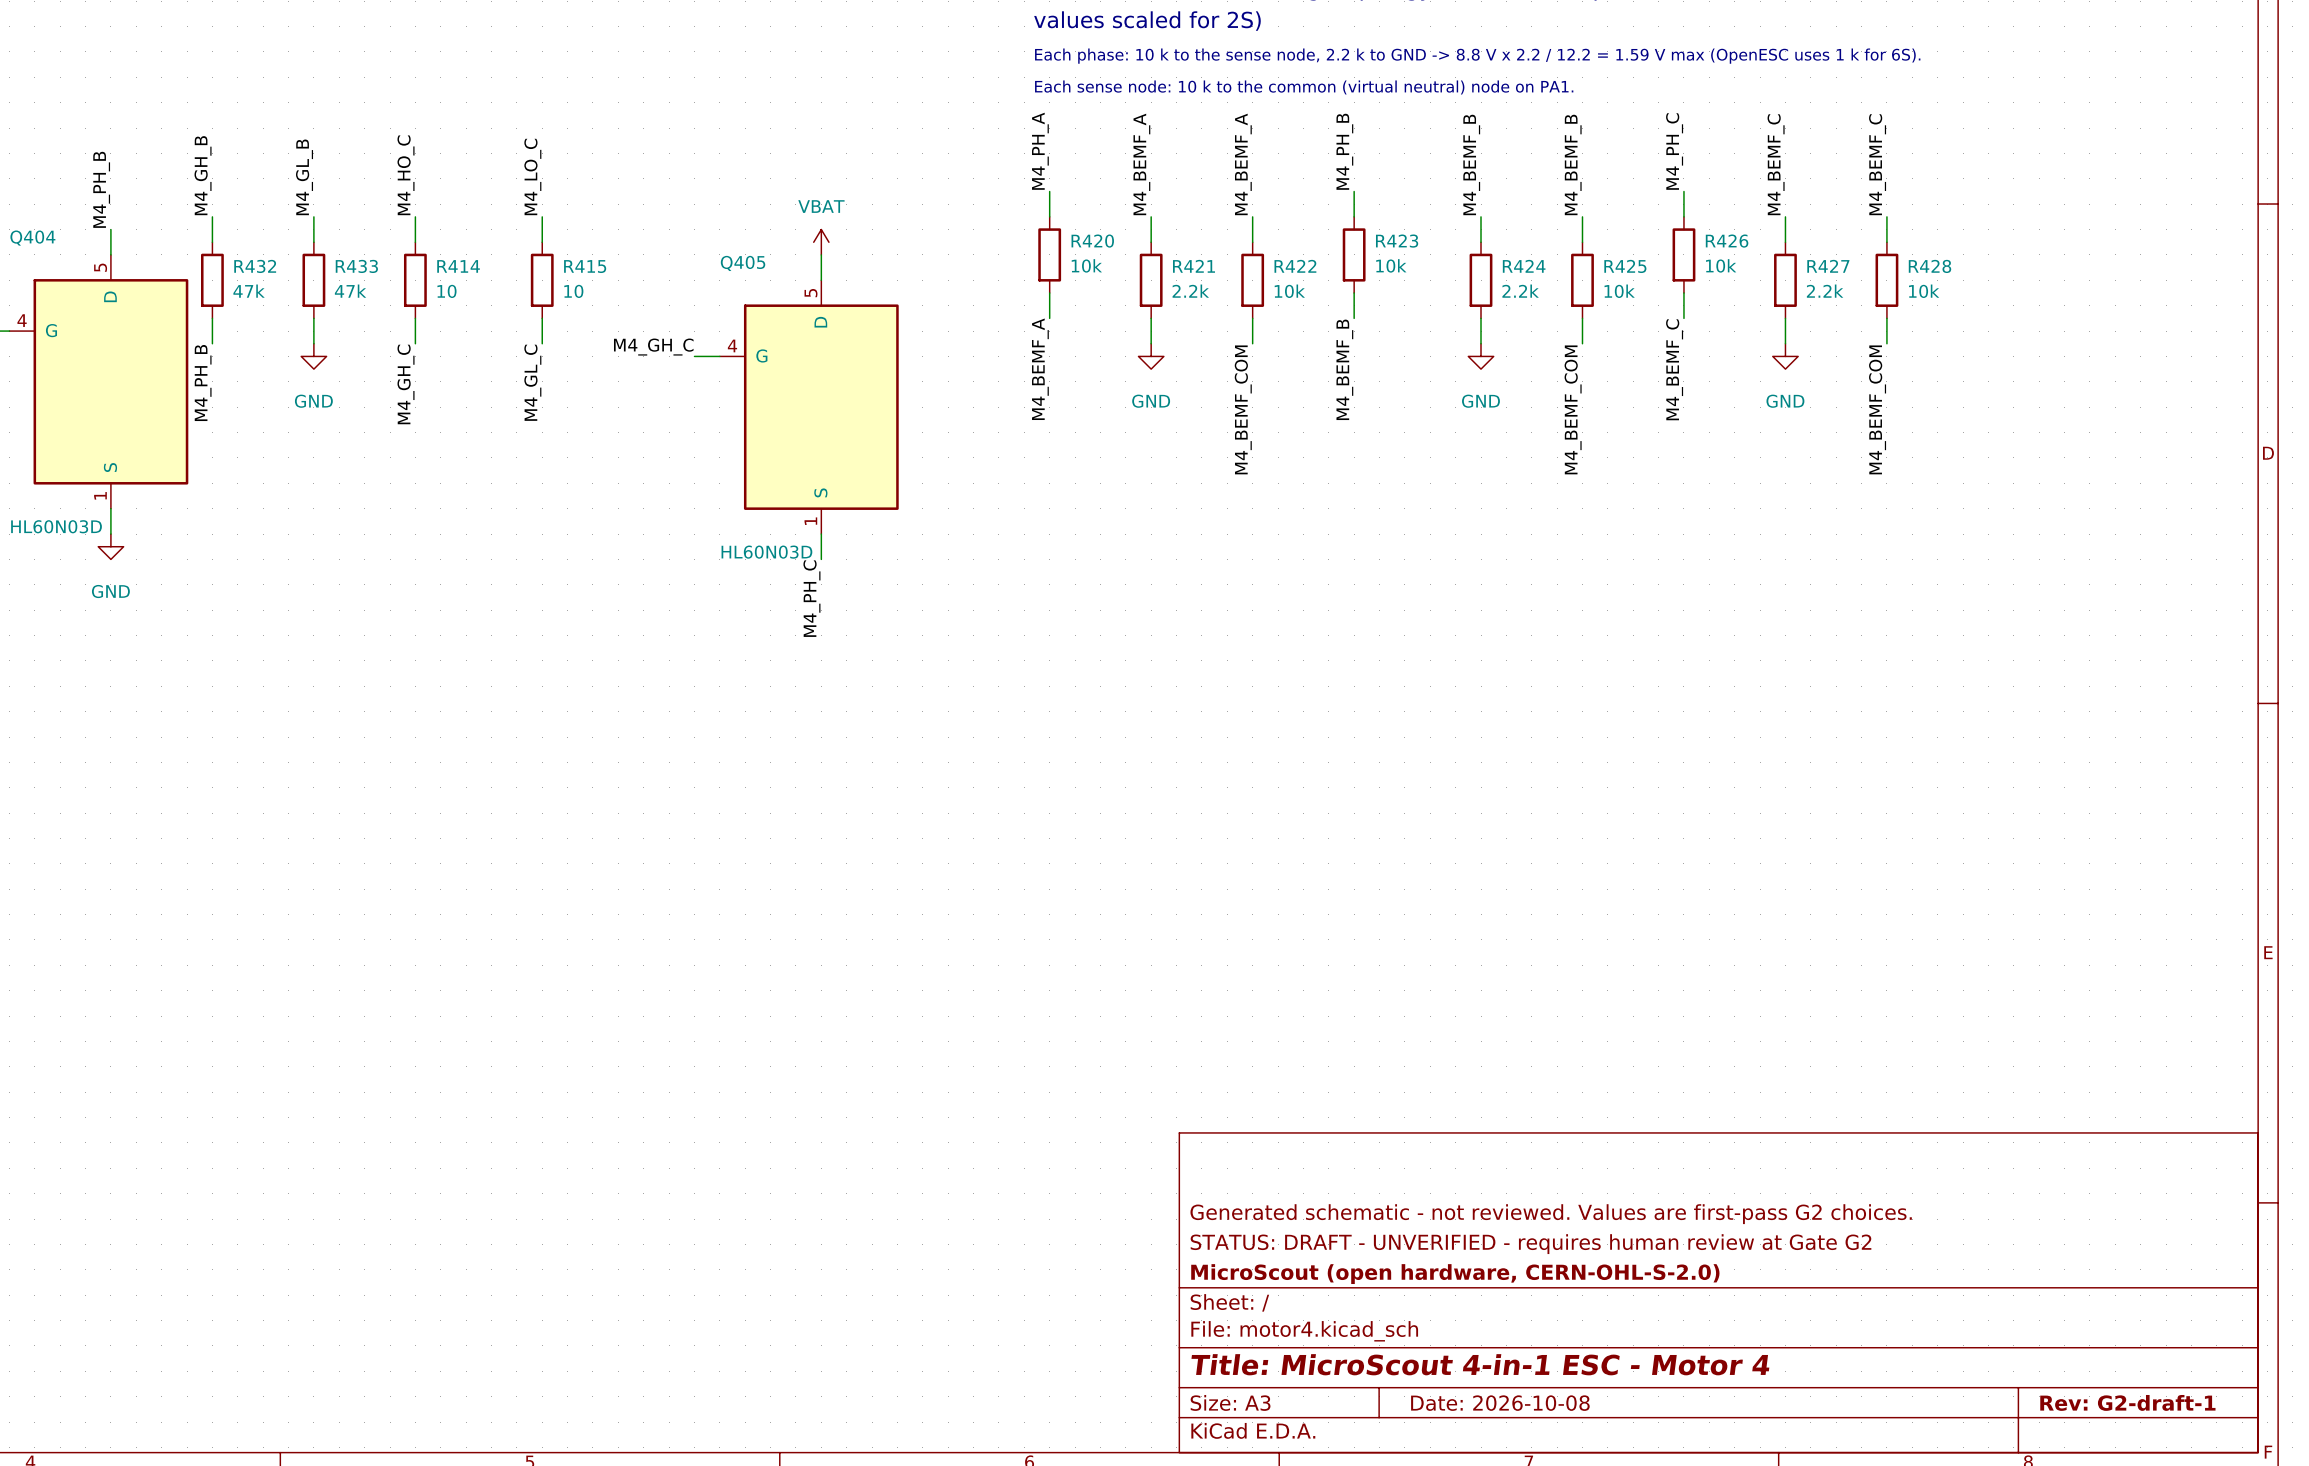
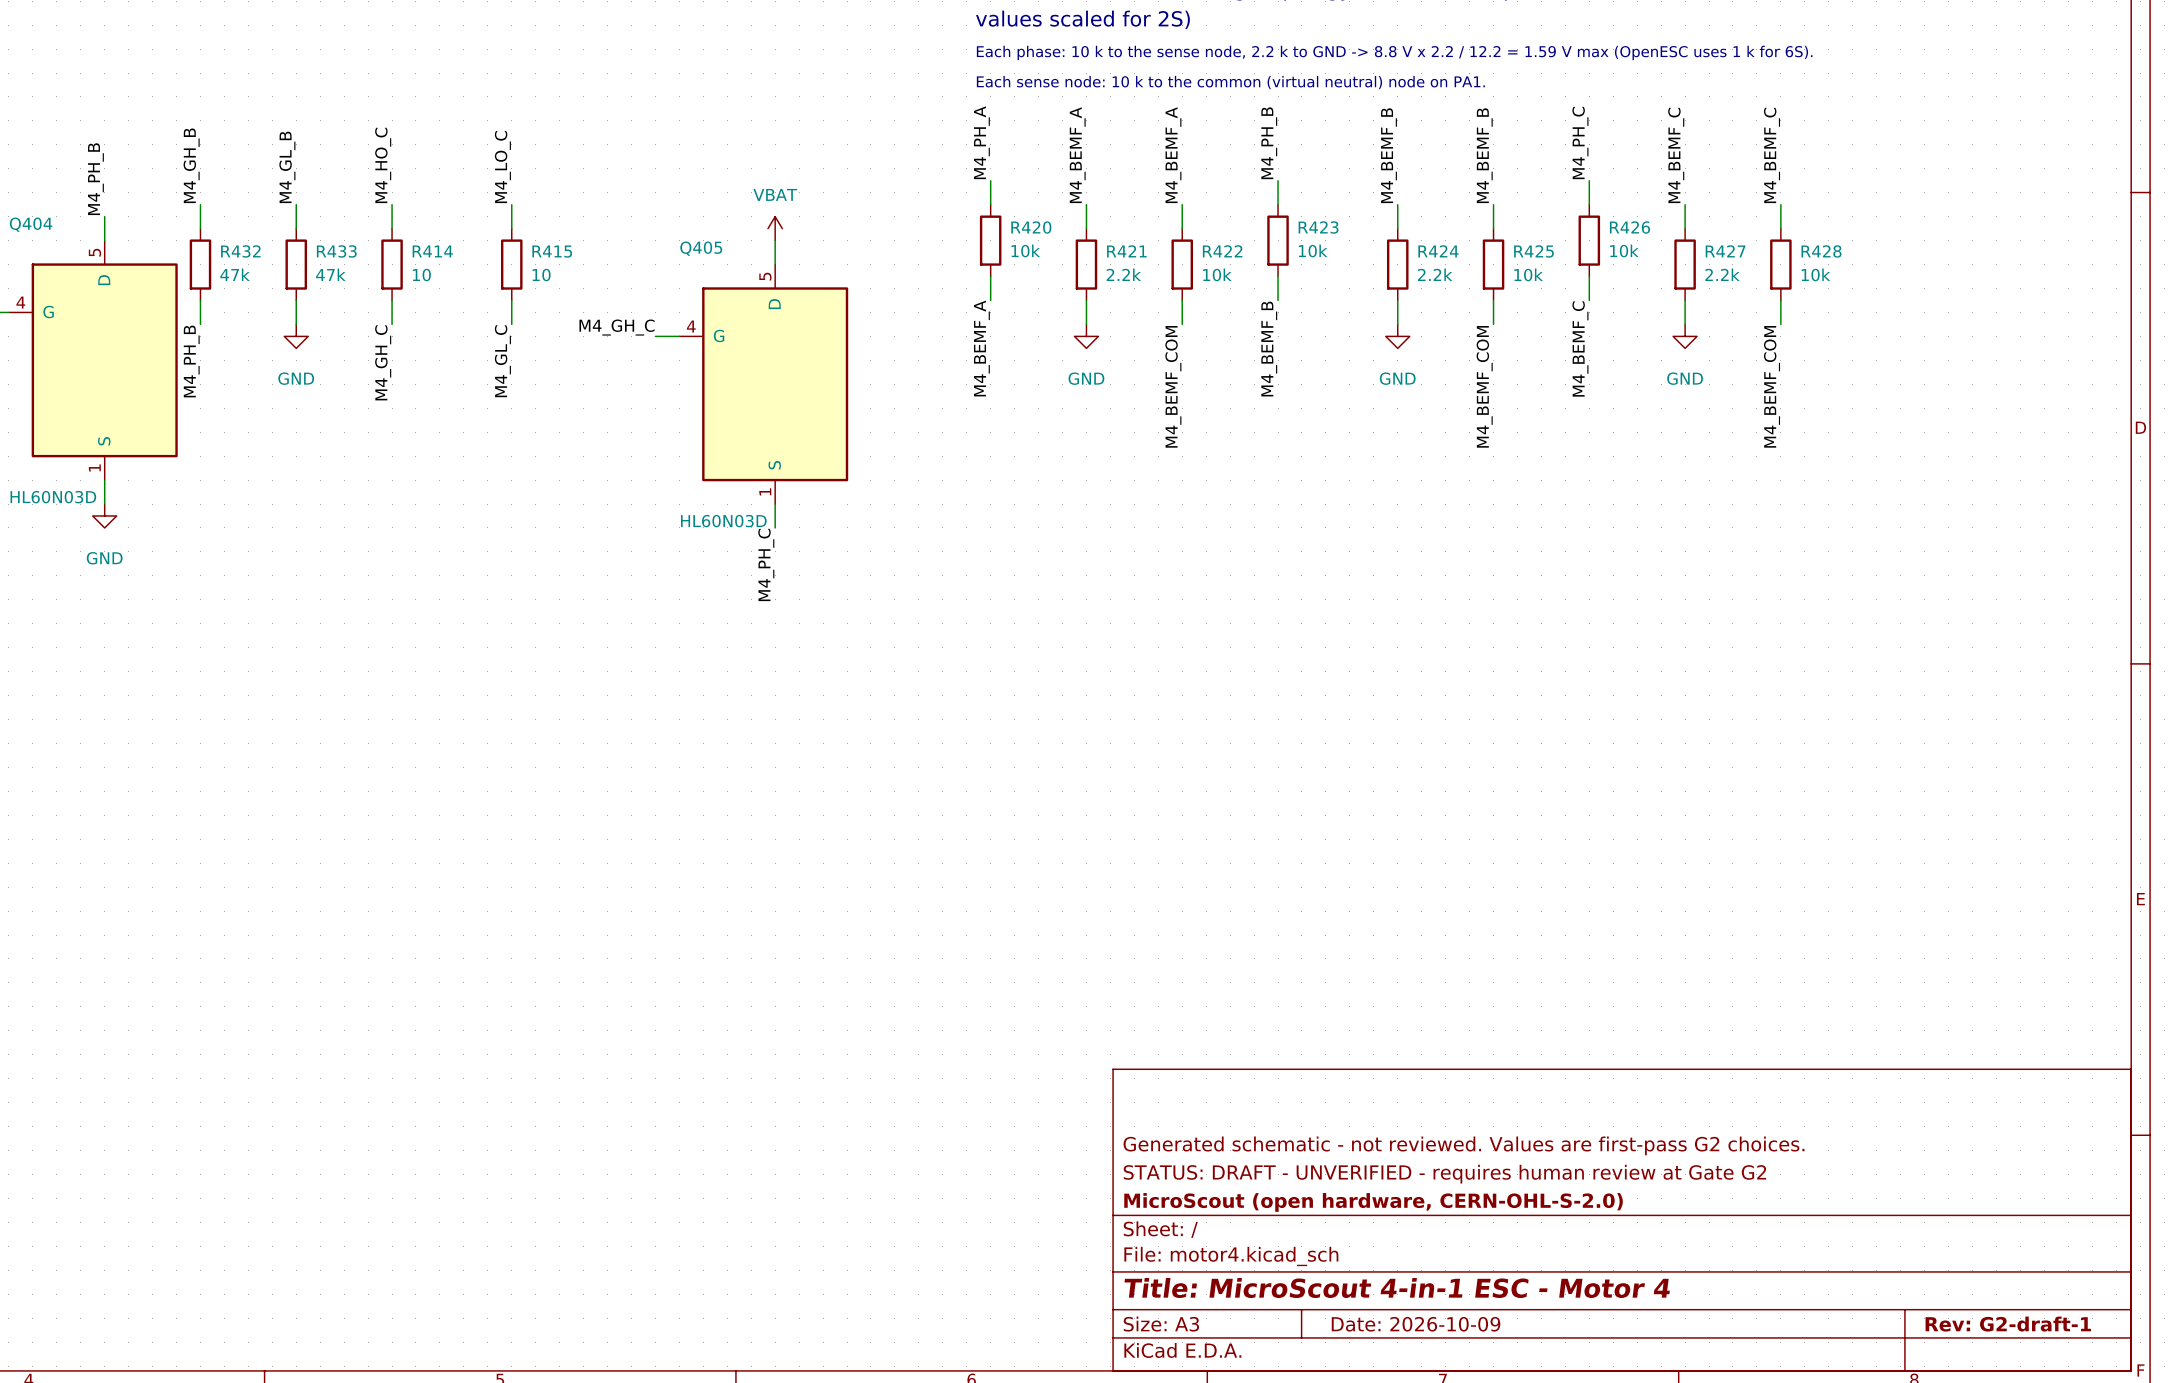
title block: Date: 2026-10-08 (1500, 1403) -> Date: 2026-10-09 (1416, 1324)

